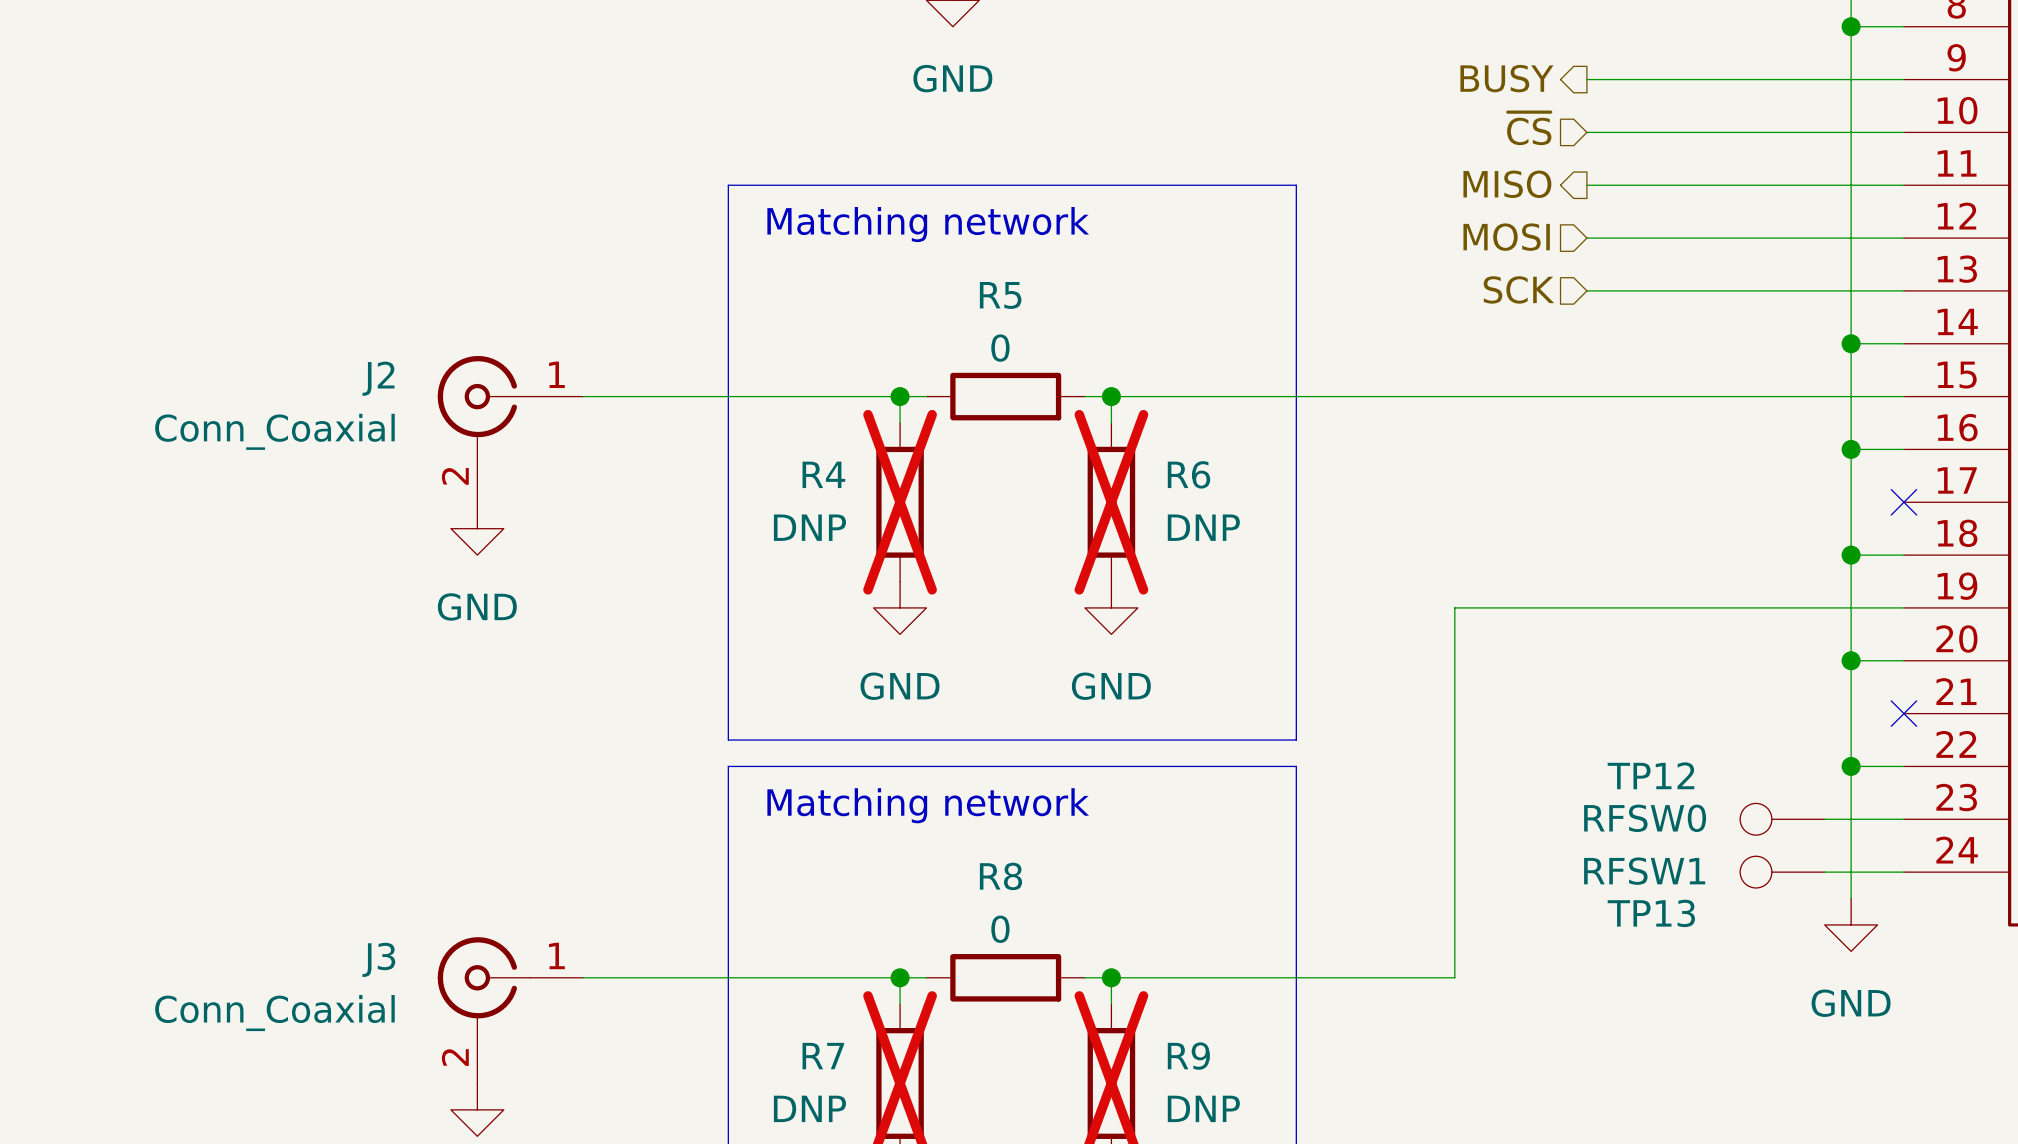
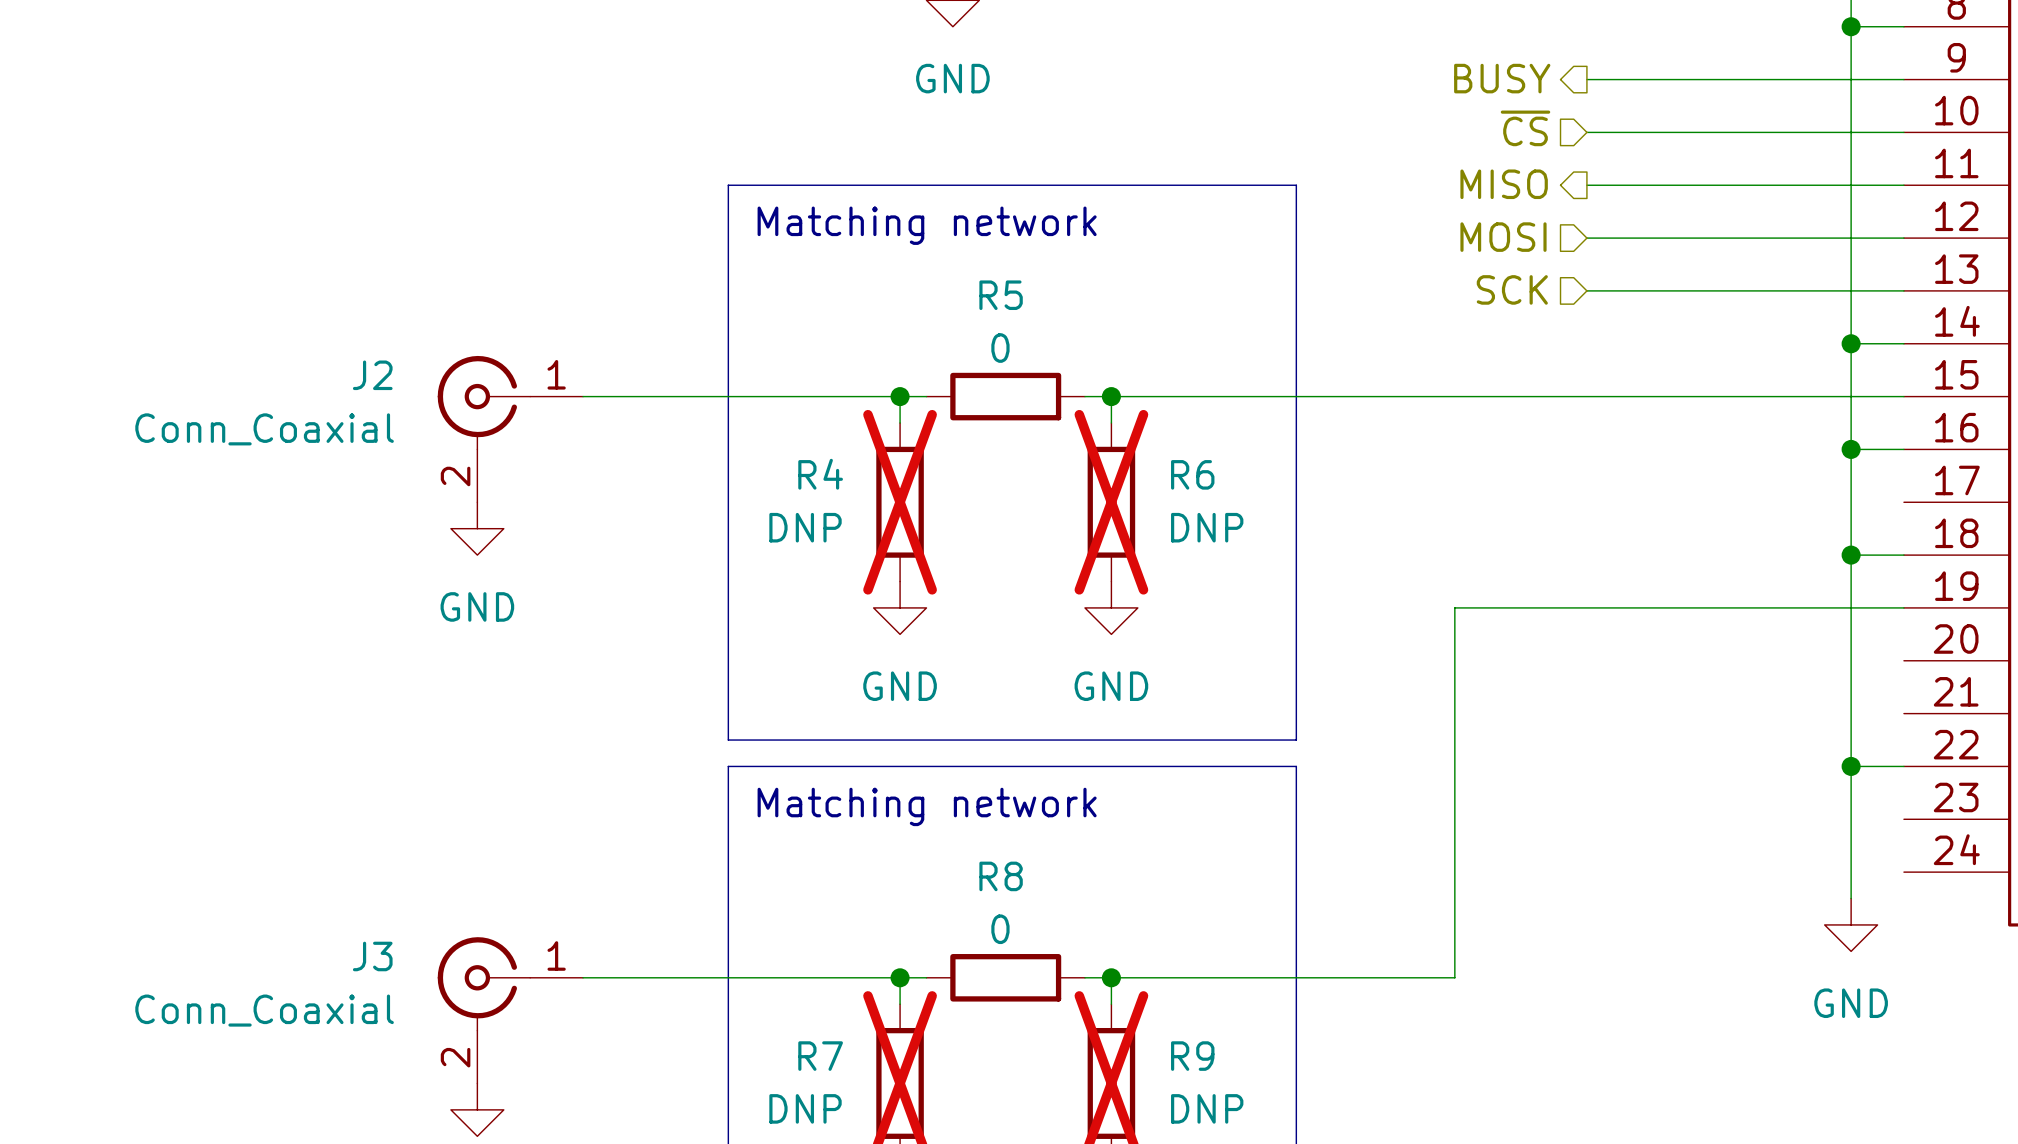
no-connect mark: (1903, 502) -> none
wire: (1851, 660) (1903, 660) -> none
junction: (1851, 660) -> none
no-connect mark: (1903, 713) -> none
TP12: RFSW0 (1782, 819) -> none
wire: (1824, 819) (1903, 819) -> none
TP13: RFSW1 (1782, 872) -> none
wire: (1824, 872) (1903, 872) -> none

